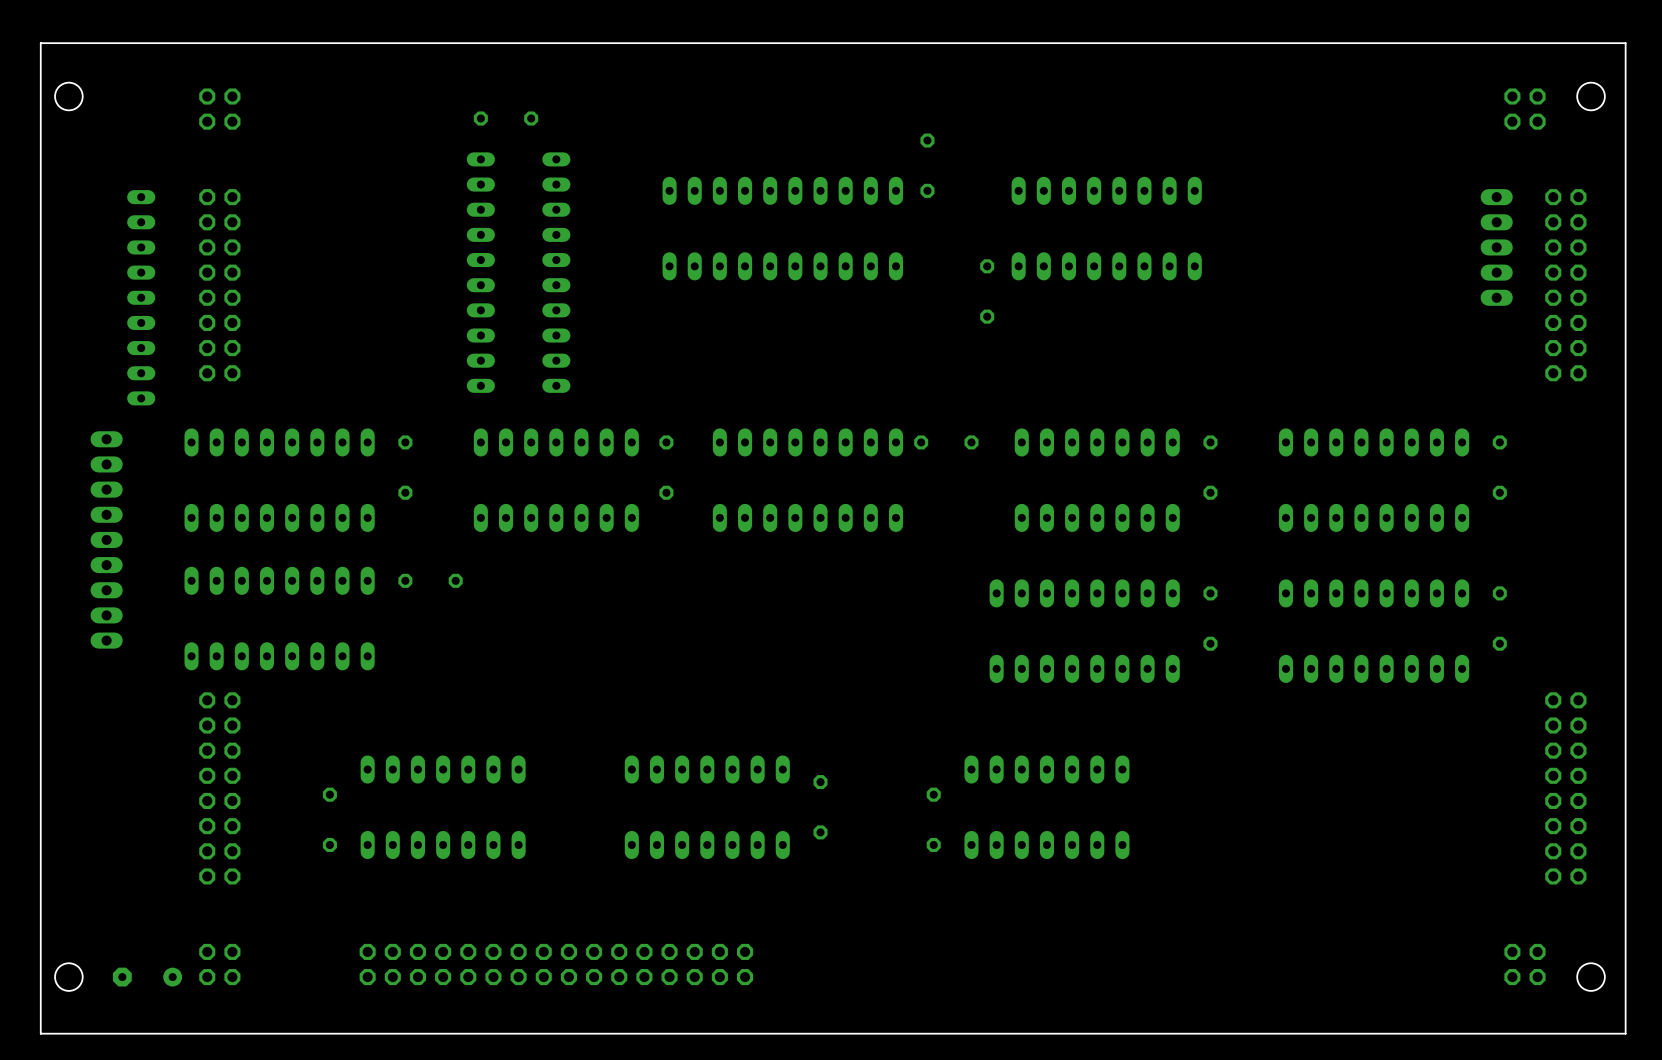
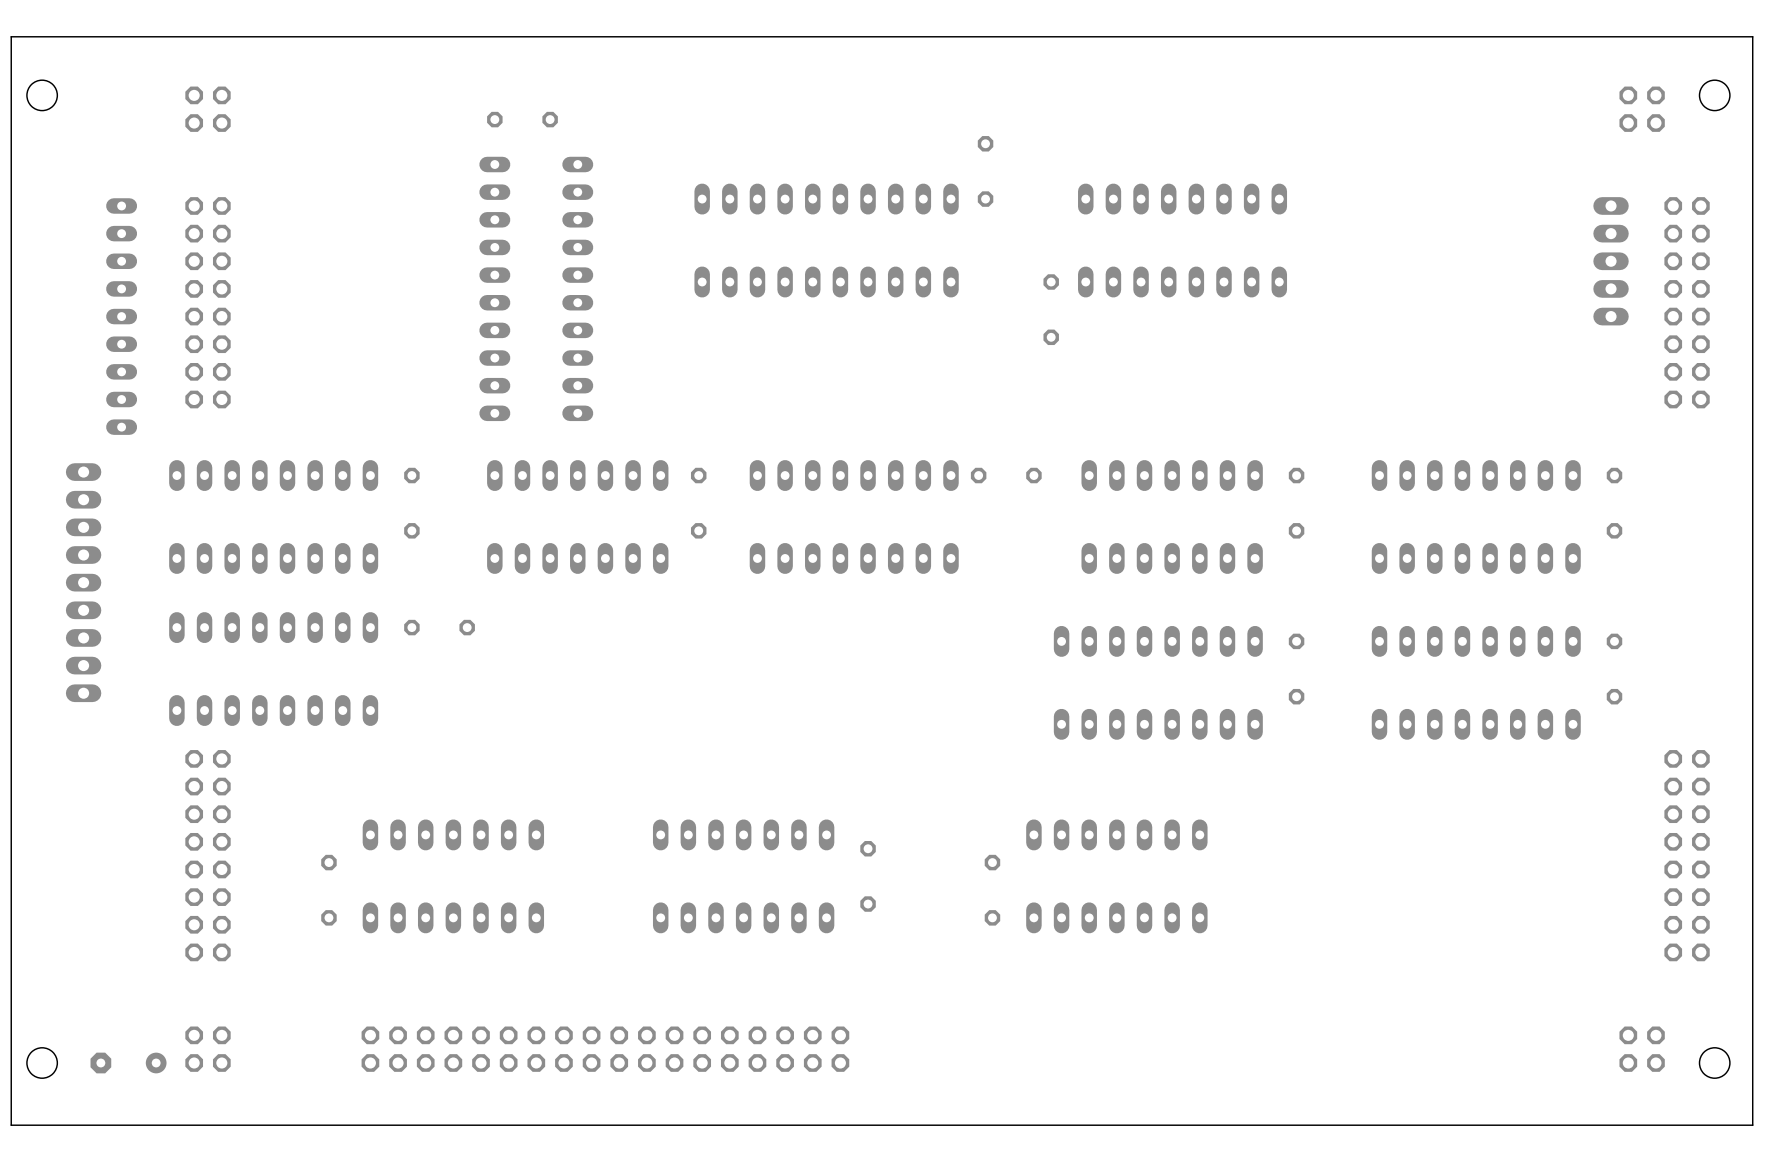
part: none -> (605, 1049)

